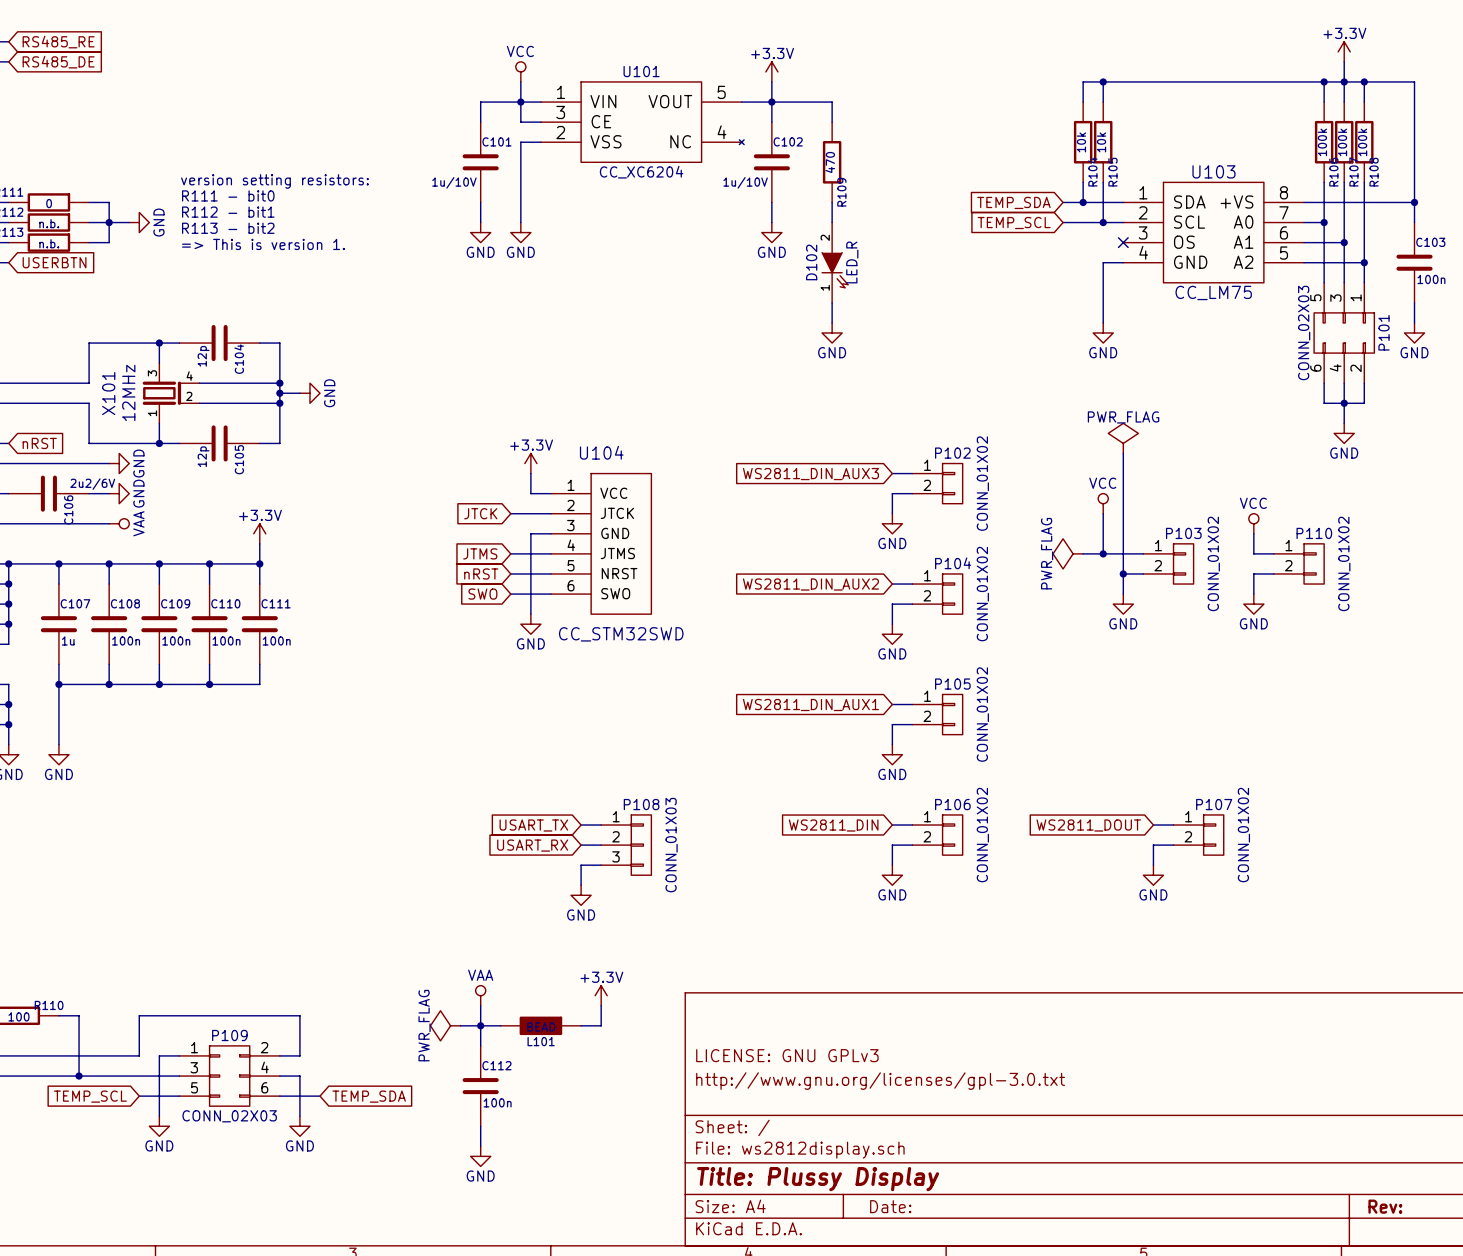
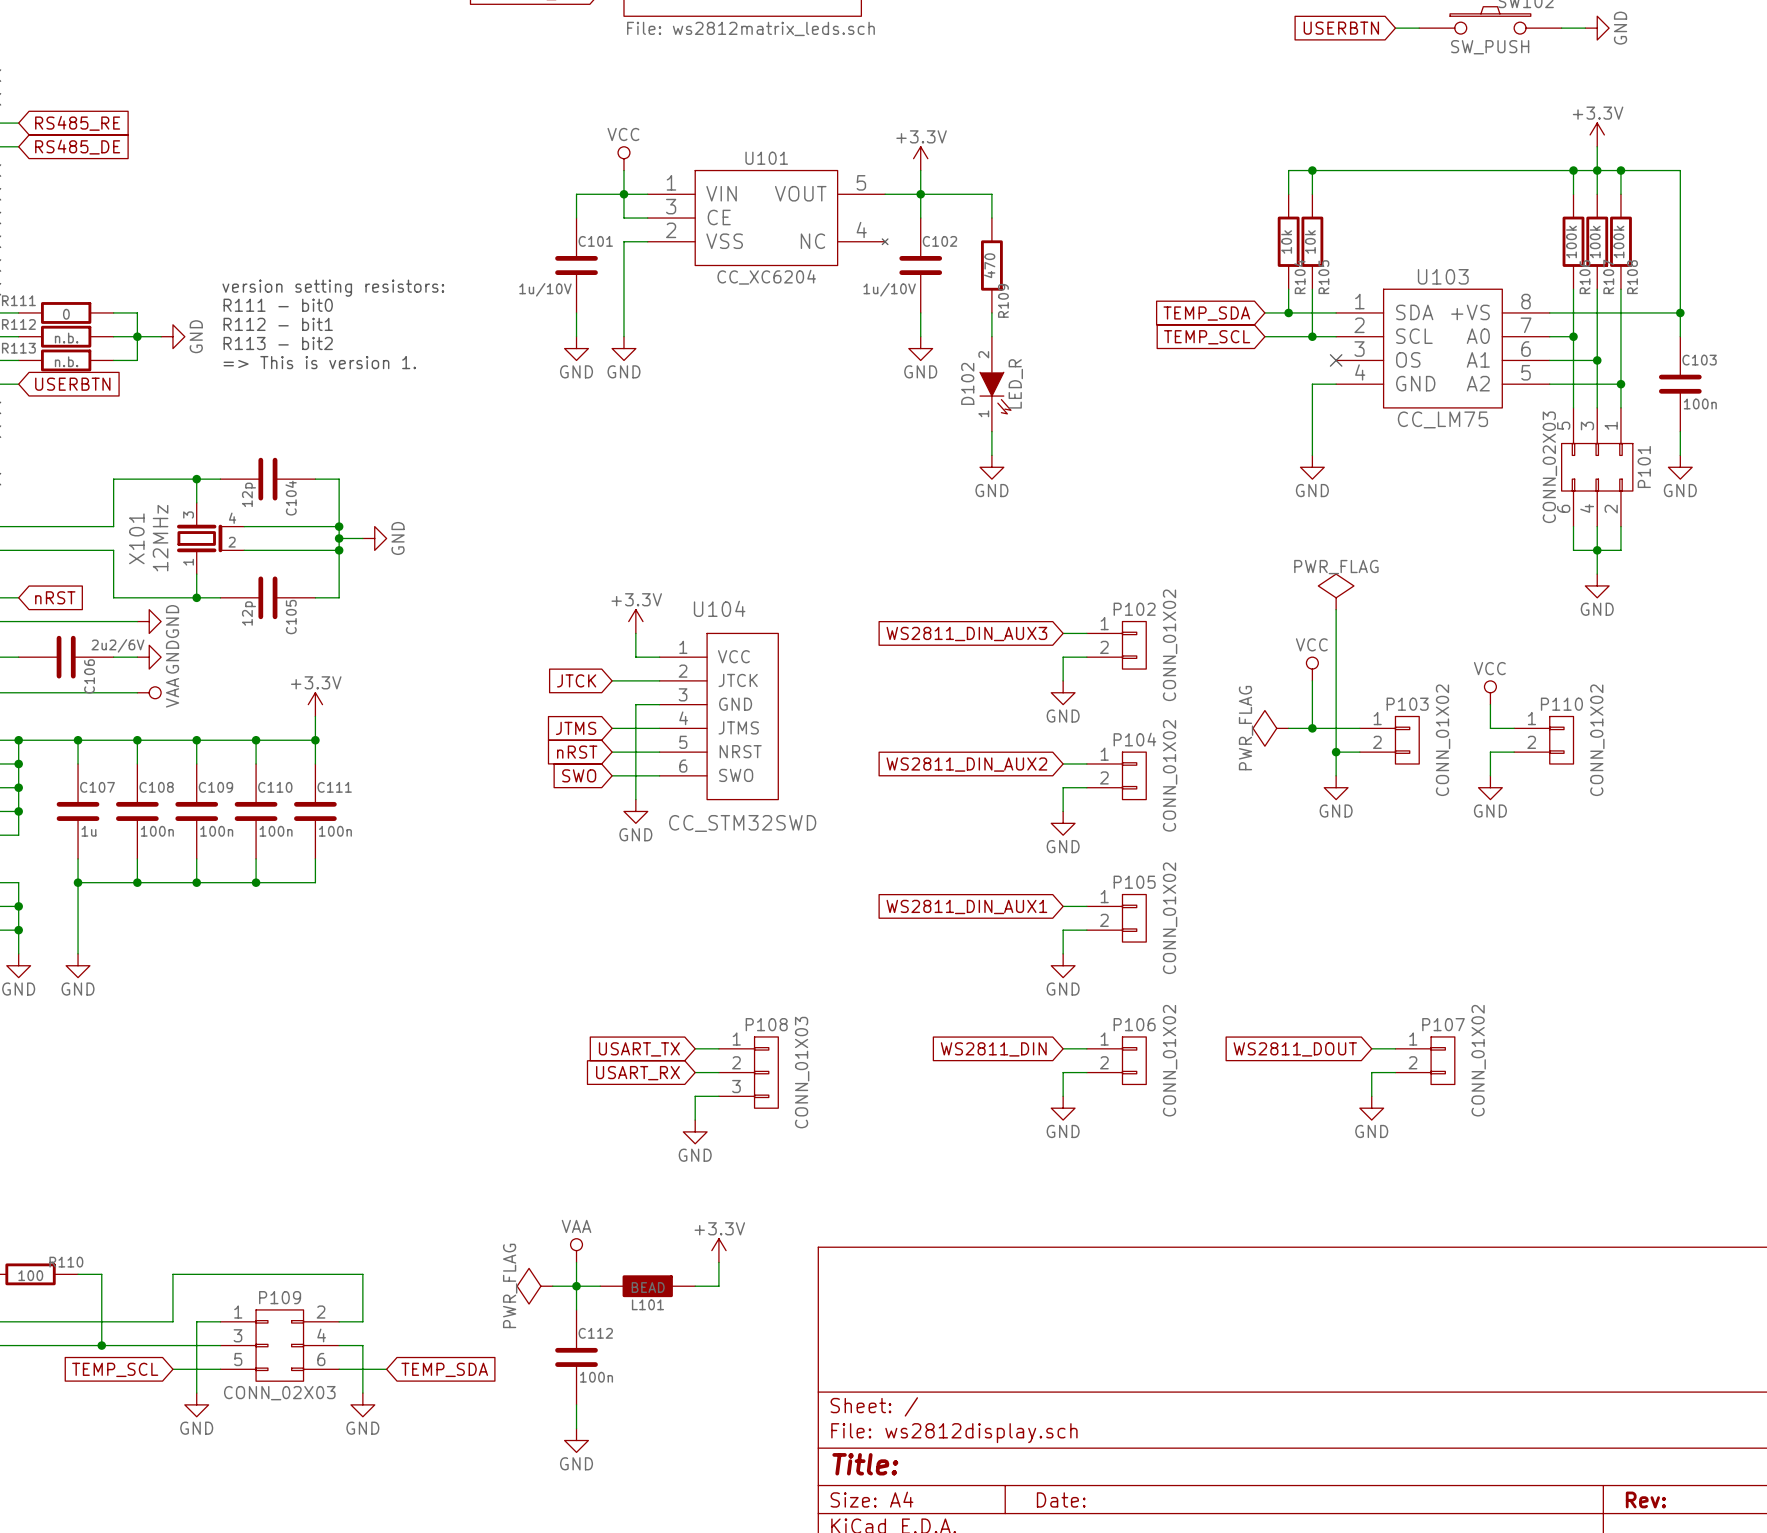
title block: LICENSE: GNU GPLv3 (787, 1055) -> none
title block: http://www.gnu.org/licenses/gpl-3.0.txt (880, 1081) -> none
title block: Title: Plussy Display (818, 1179) -> Title: (865, 1464)

